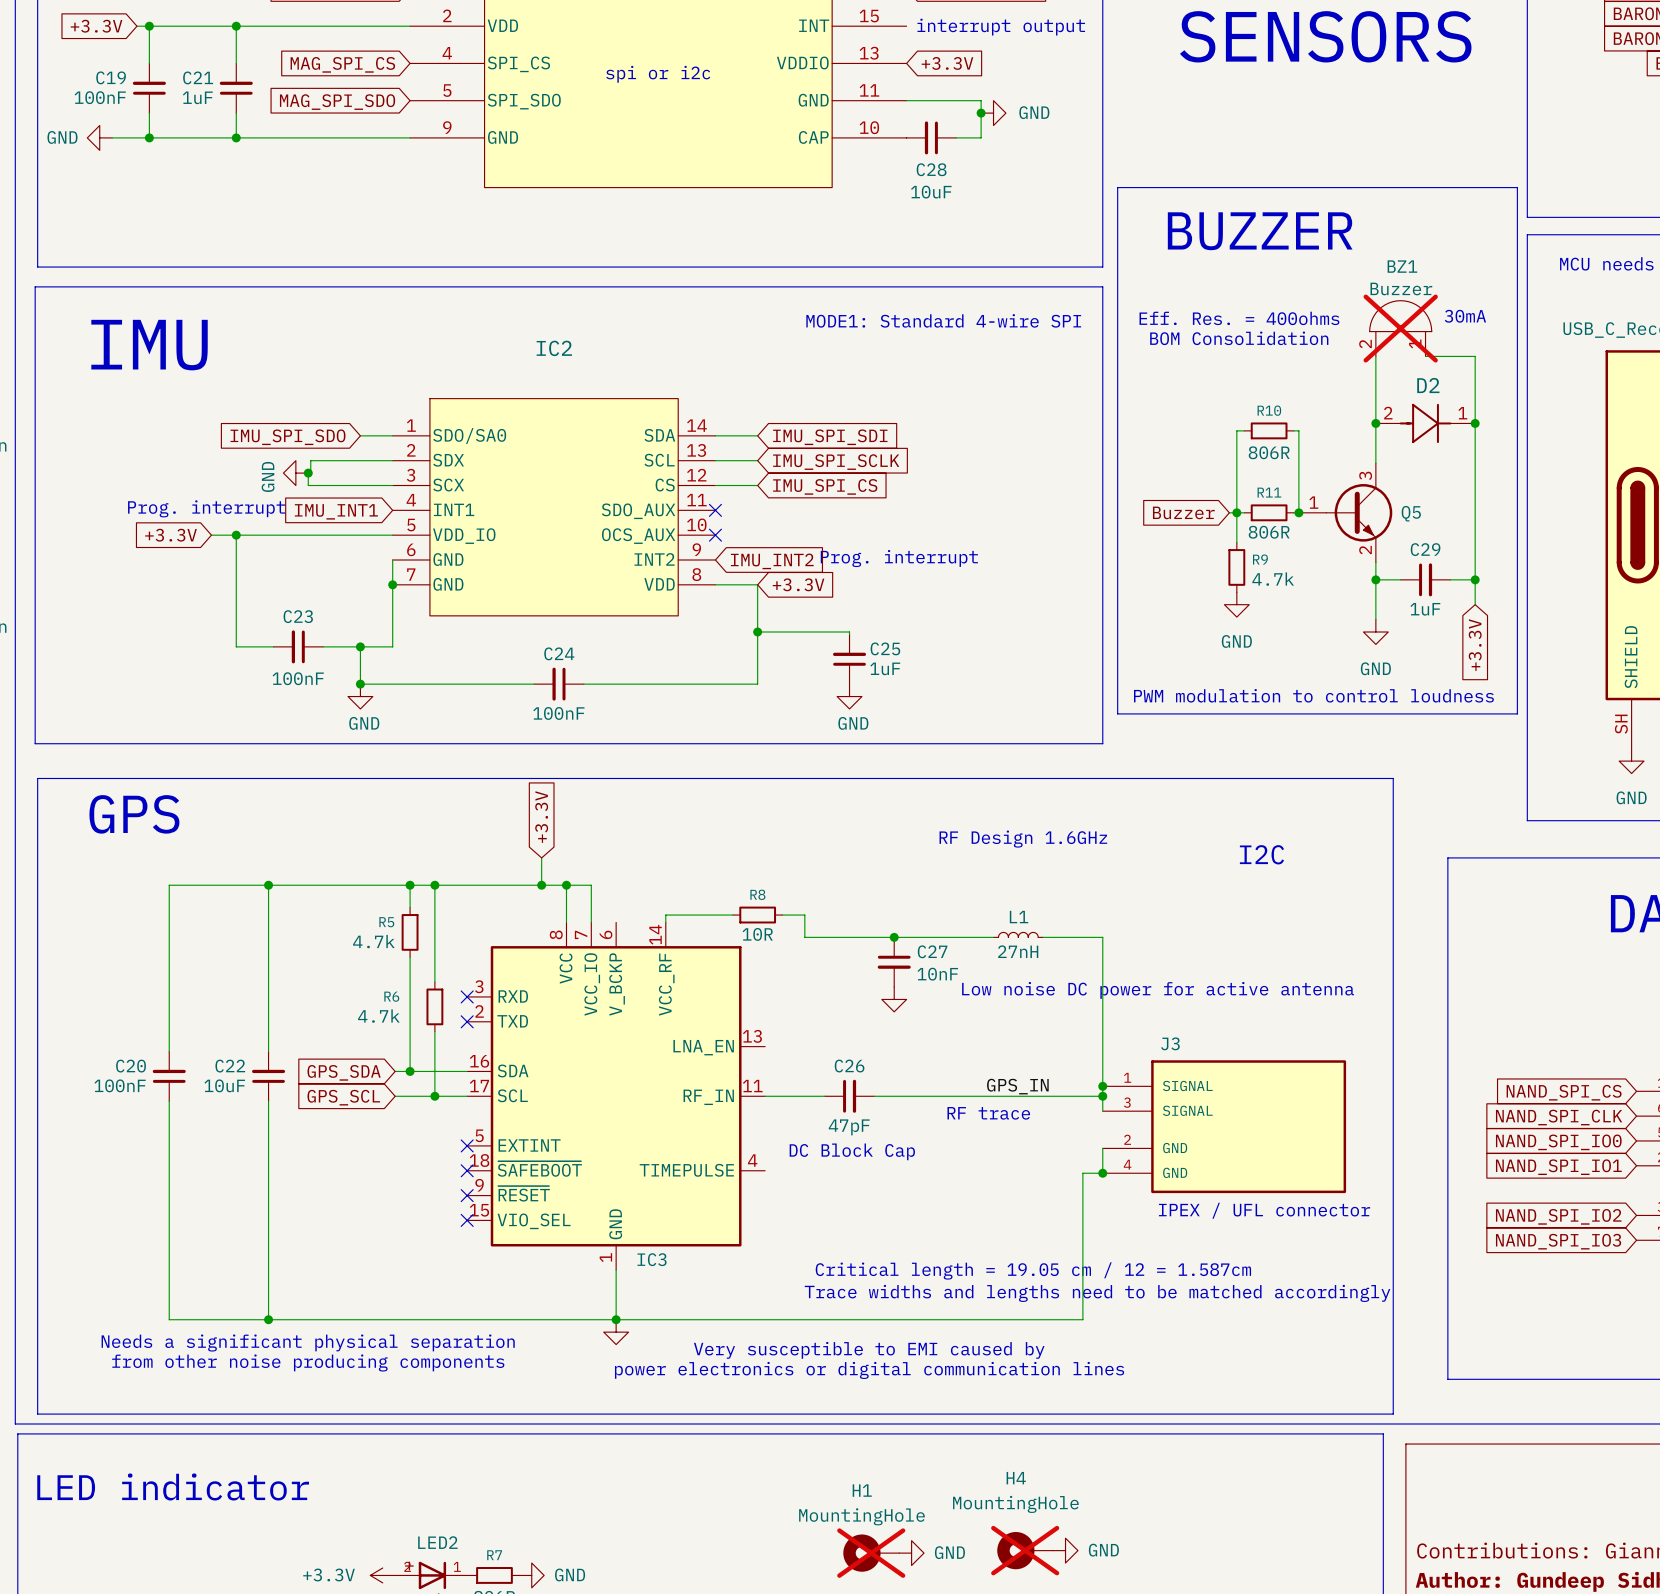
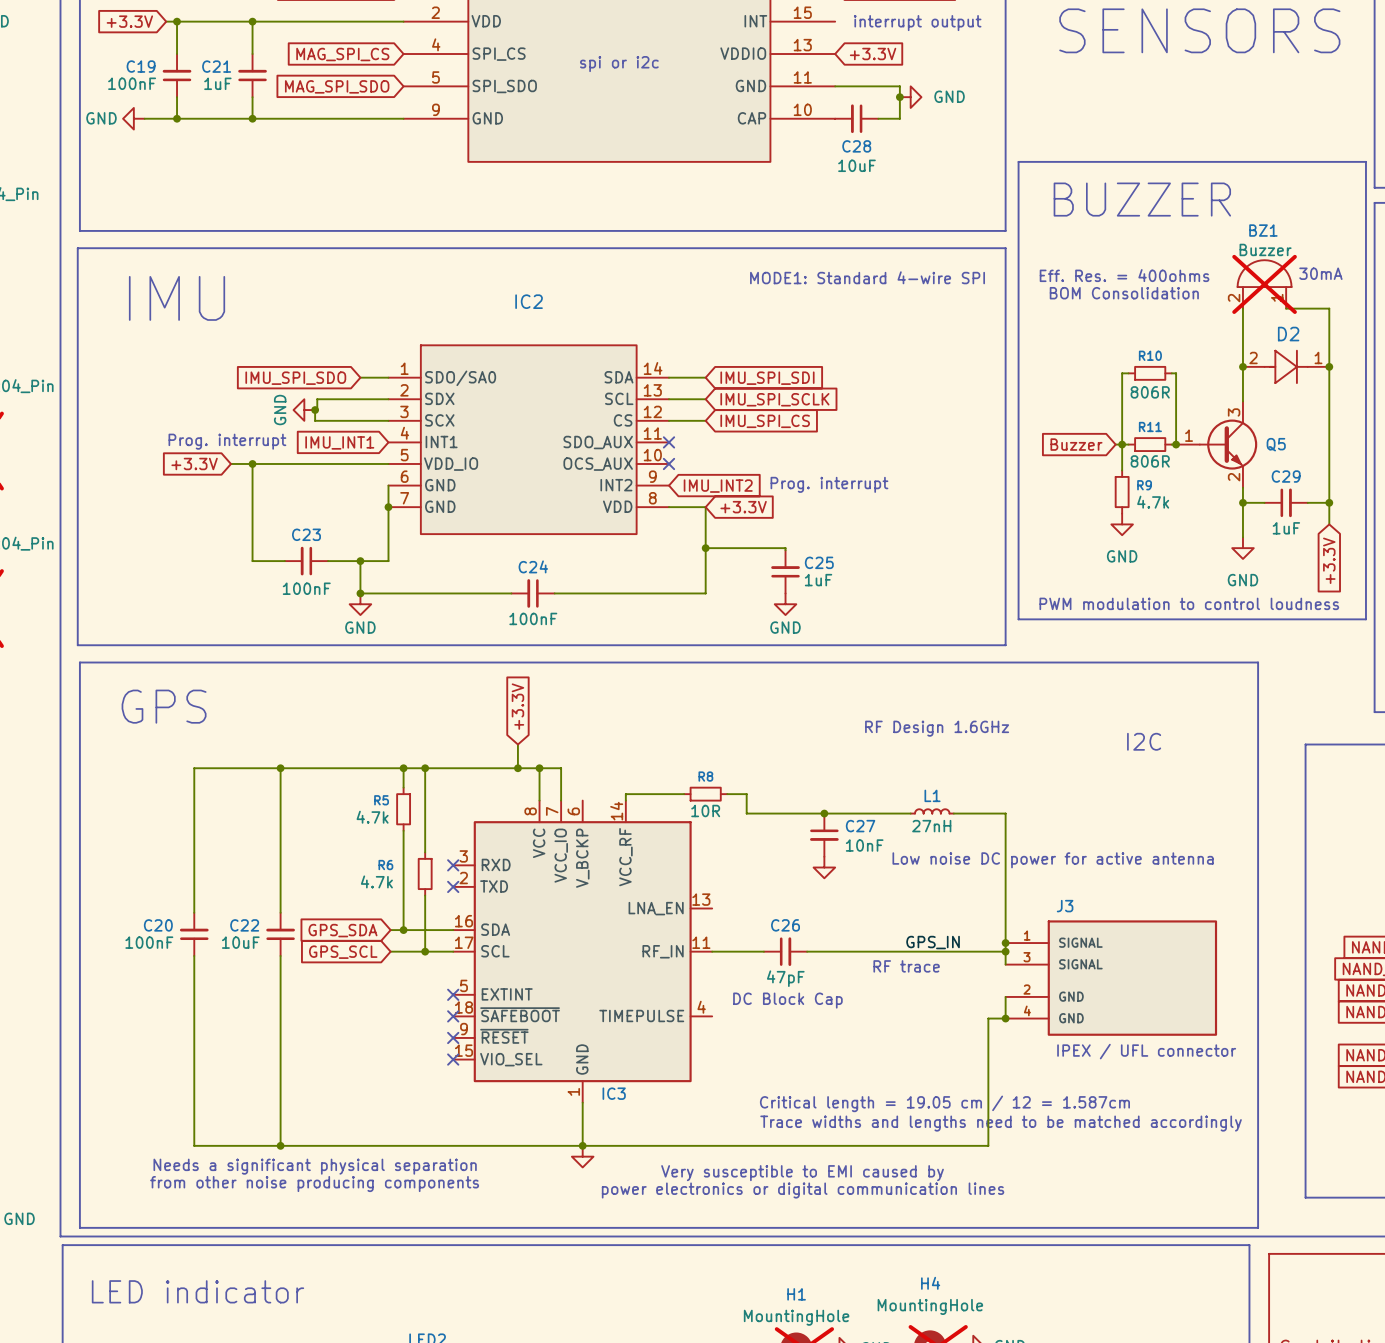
line: (37, 778) (1393, 778) -> (79, 675) (79, 662) (1258, 662) (1258, 675)

